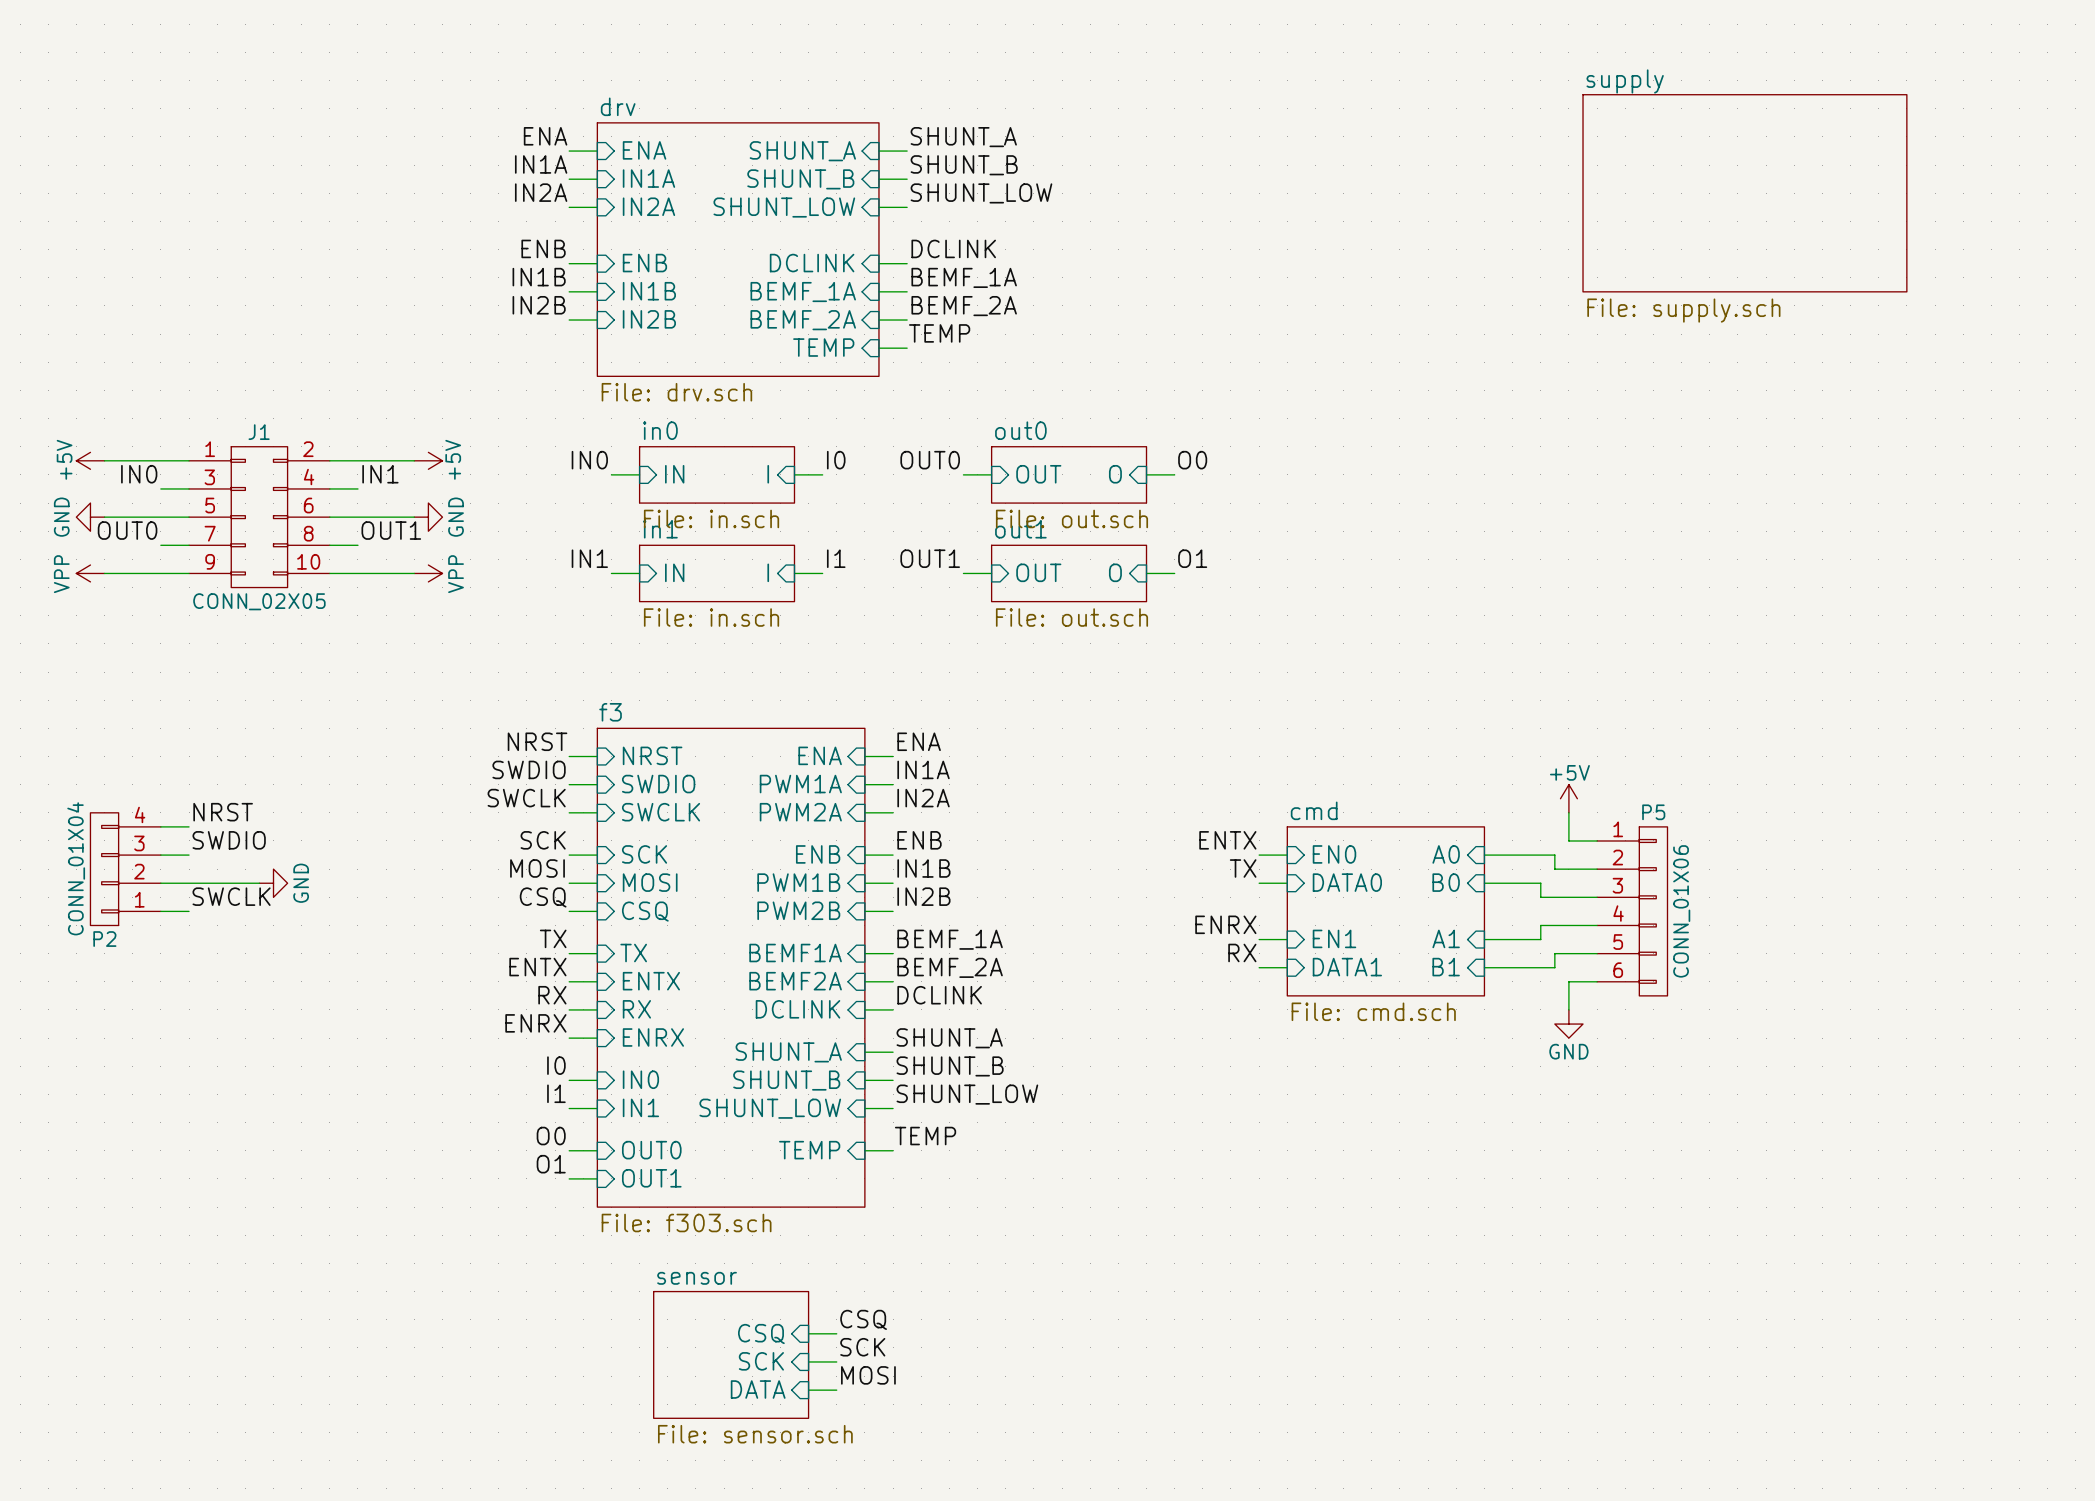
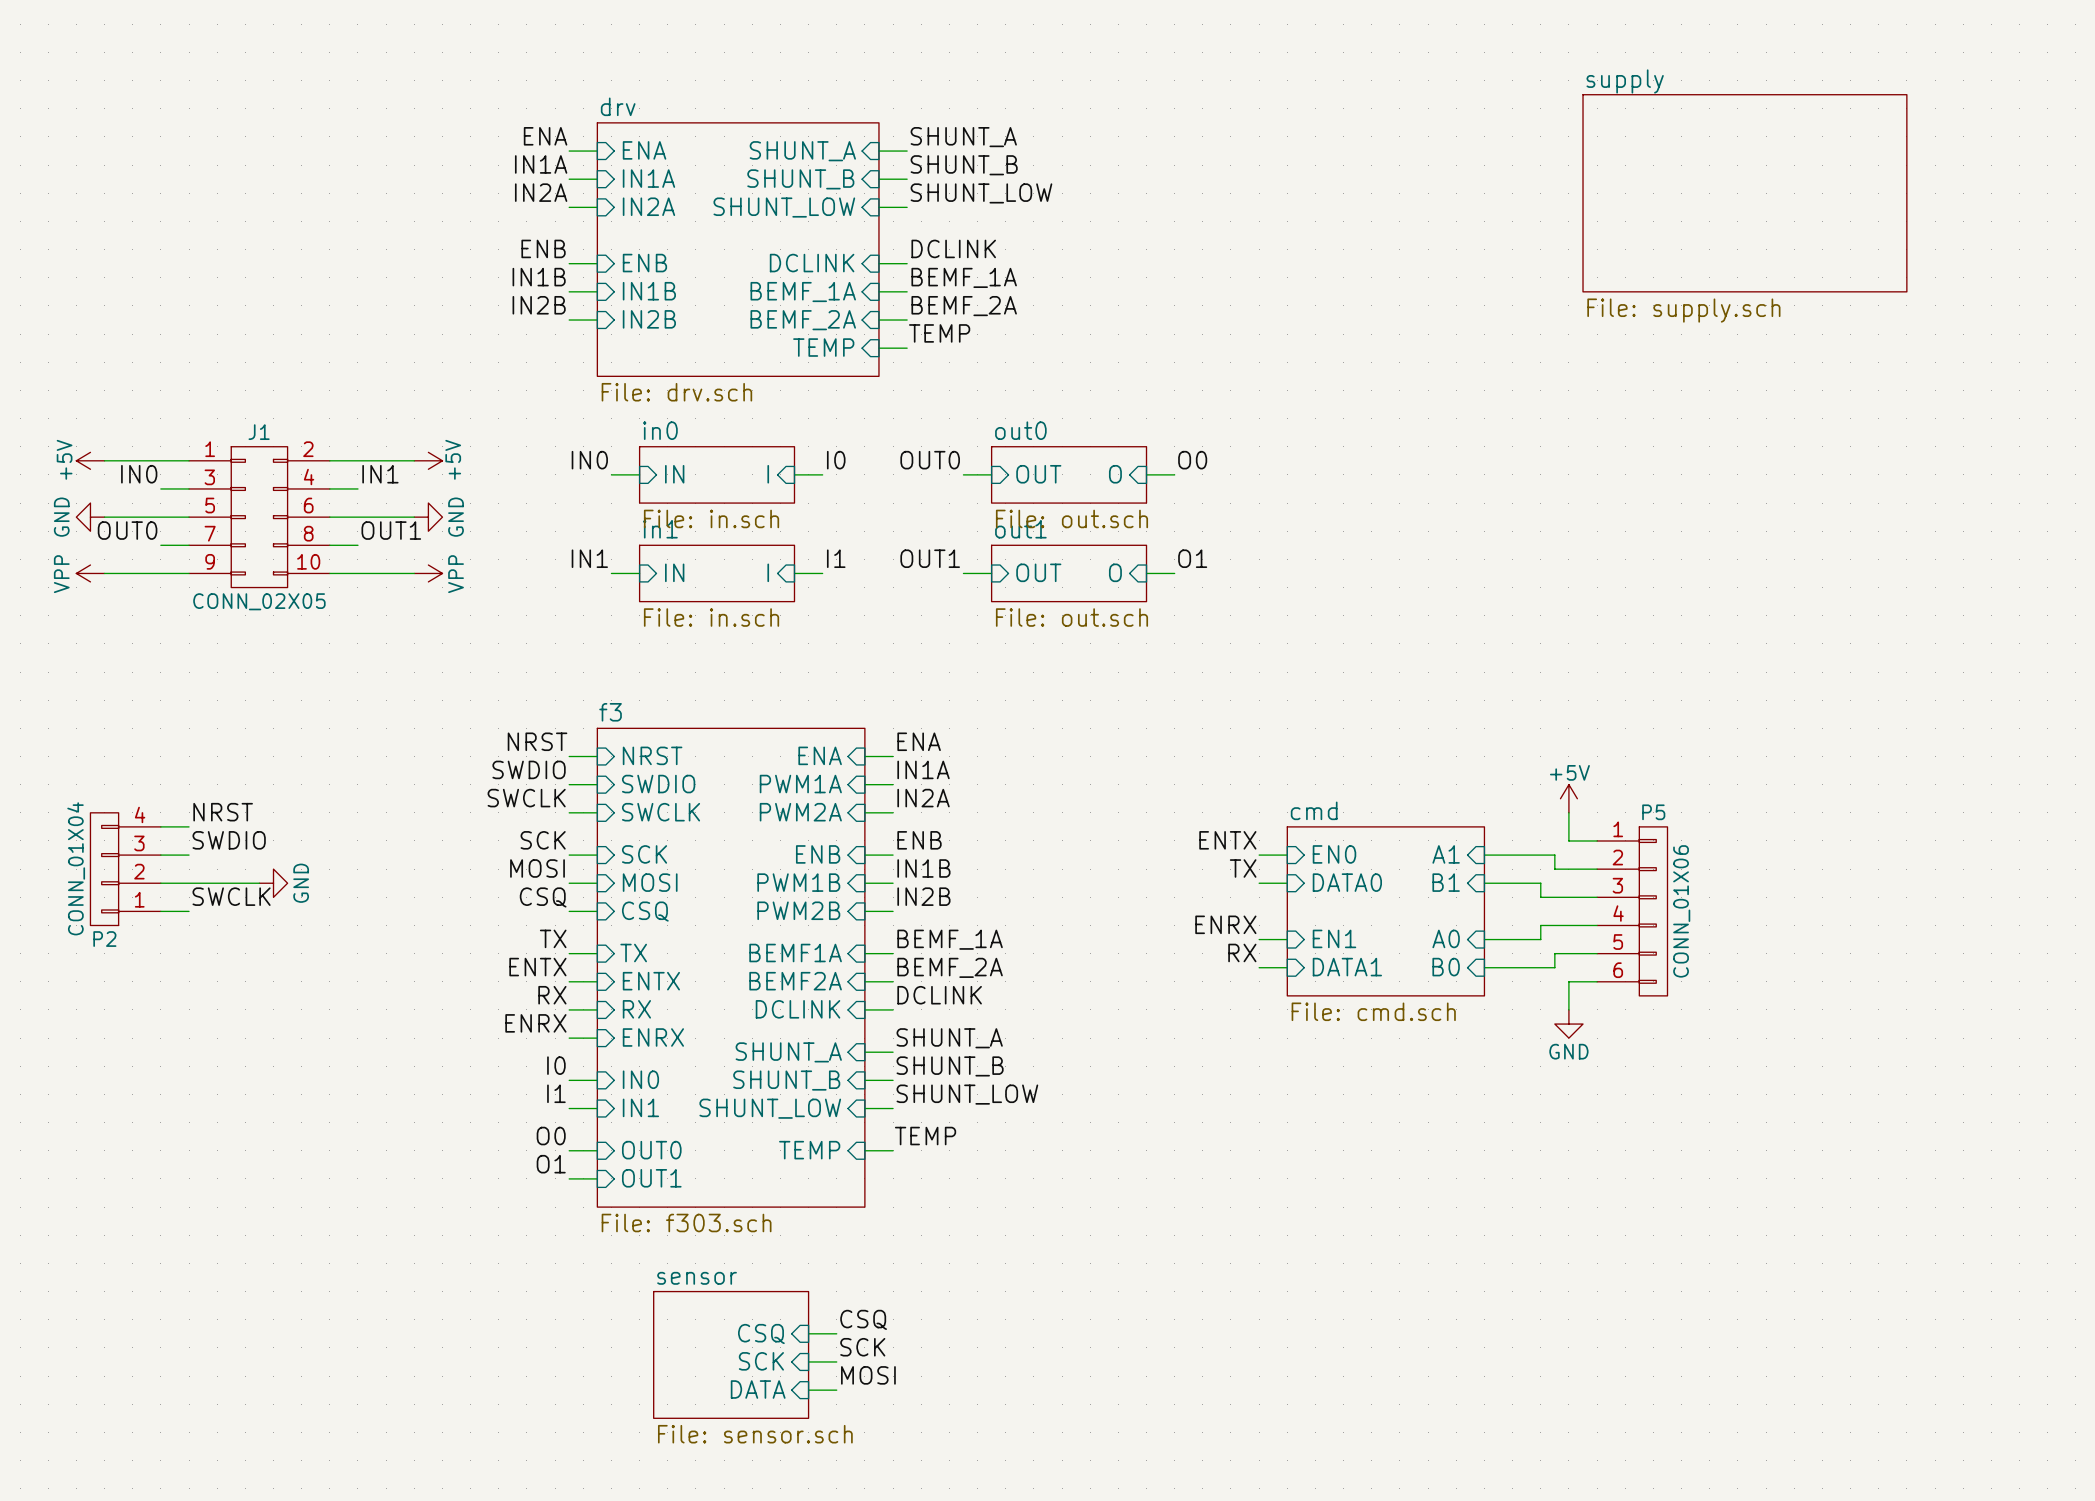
sheet pin: A0 (1446, 854) -> A1 (1446, 854)
sheet pin: B0 (1446, 882) -> B1 (1446, 882)
sheet pin: A1 (1446, 938) -> A0 (1446, 938)
sheet pin: B1 (1446, 967) -> B0 (1446, 967)

